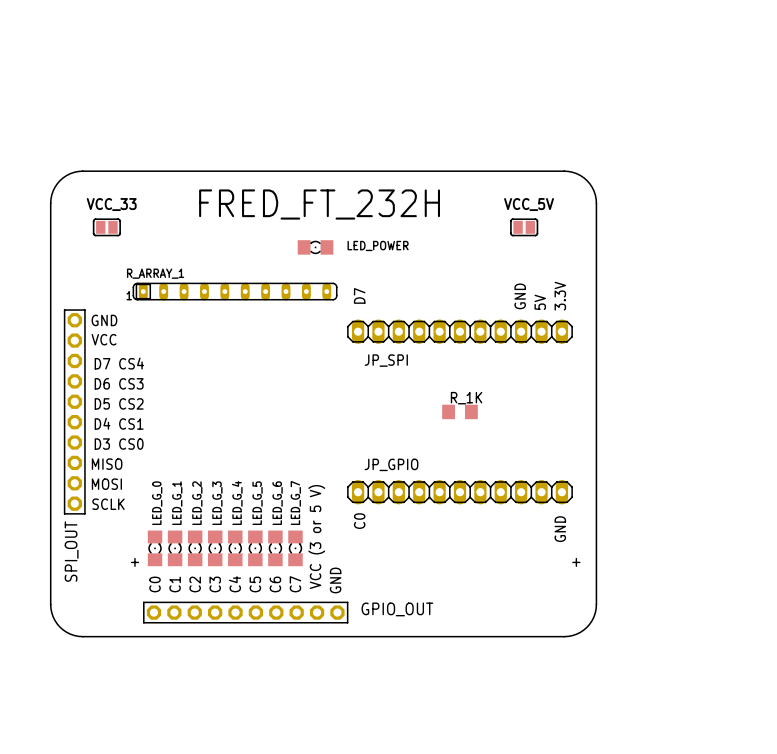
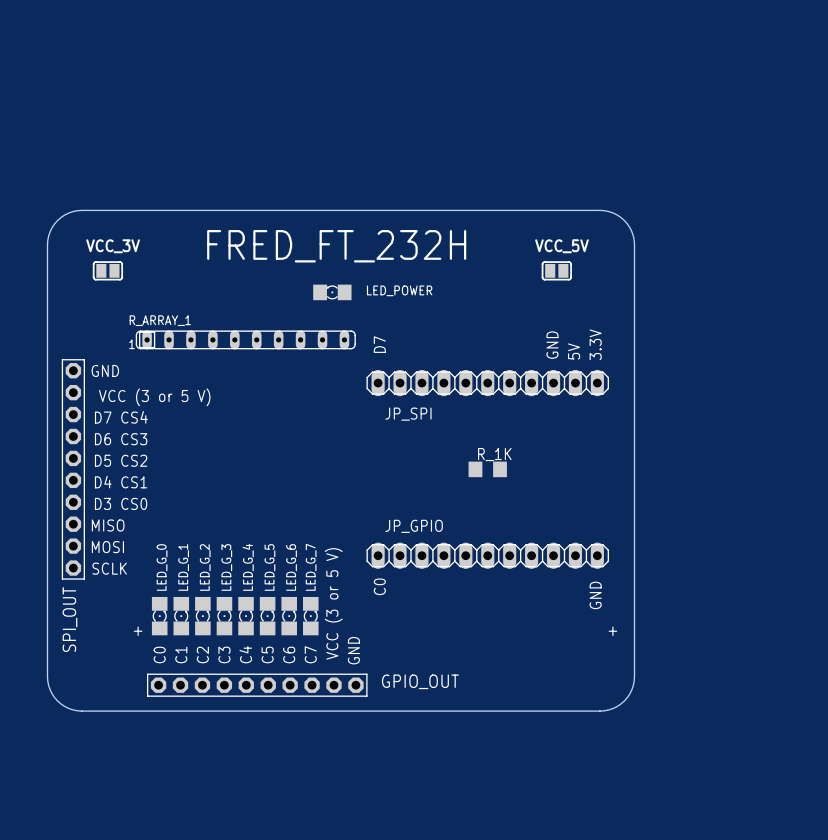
VCC_33 name: VCC_33 (111, 204) -> VCC_3V (113, 246)
text: VCC (104, 339) -> none
text: none -> VCC (3 or 5 V) (154, 397)

